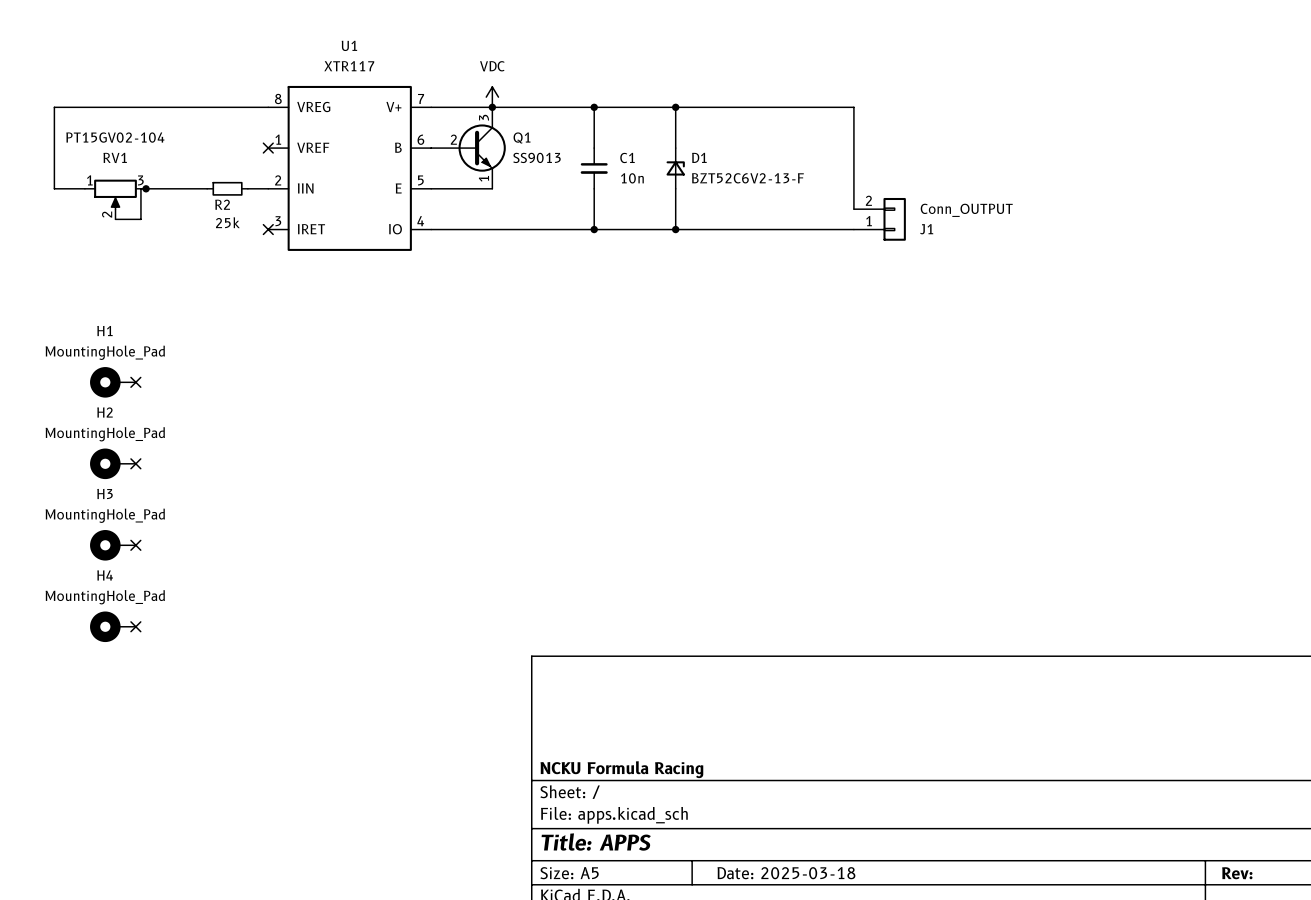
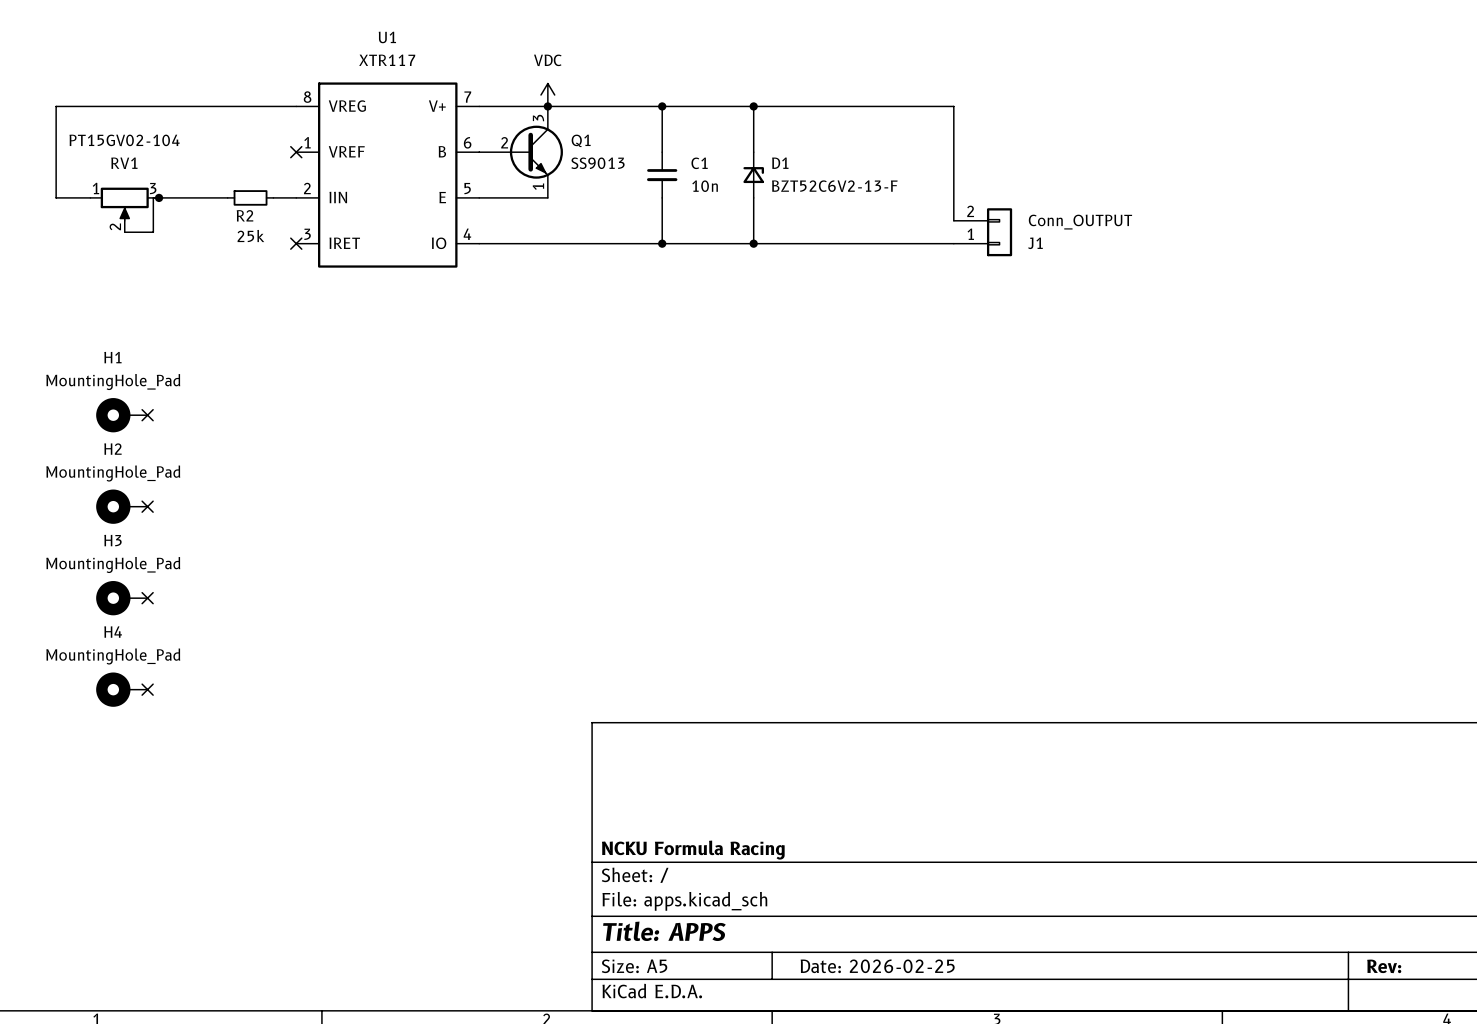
title block: Date: 2025-03-18 (786, 873) -> Date: 2026-02-25 (877, 966)

